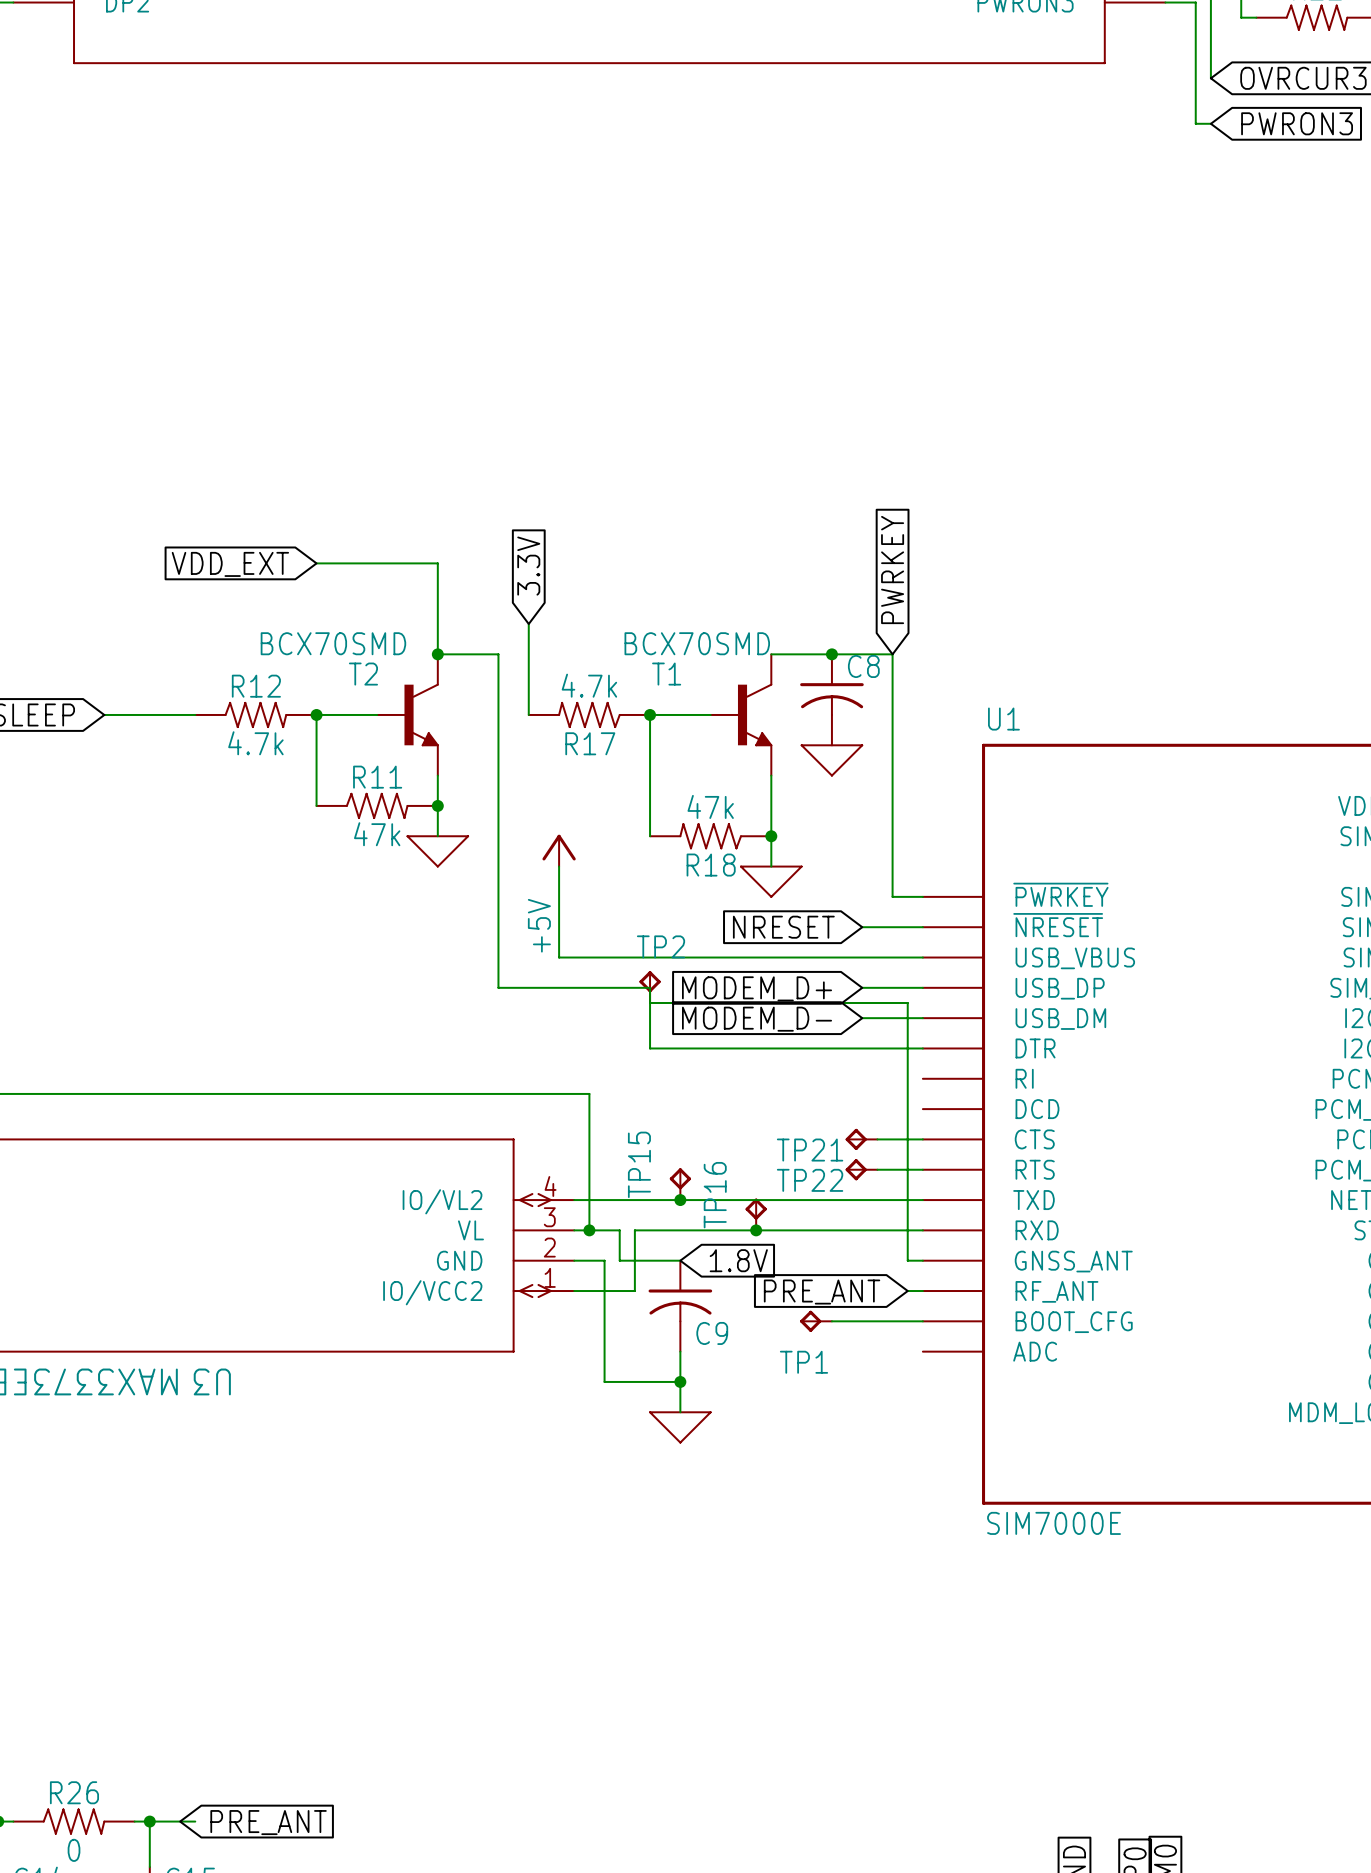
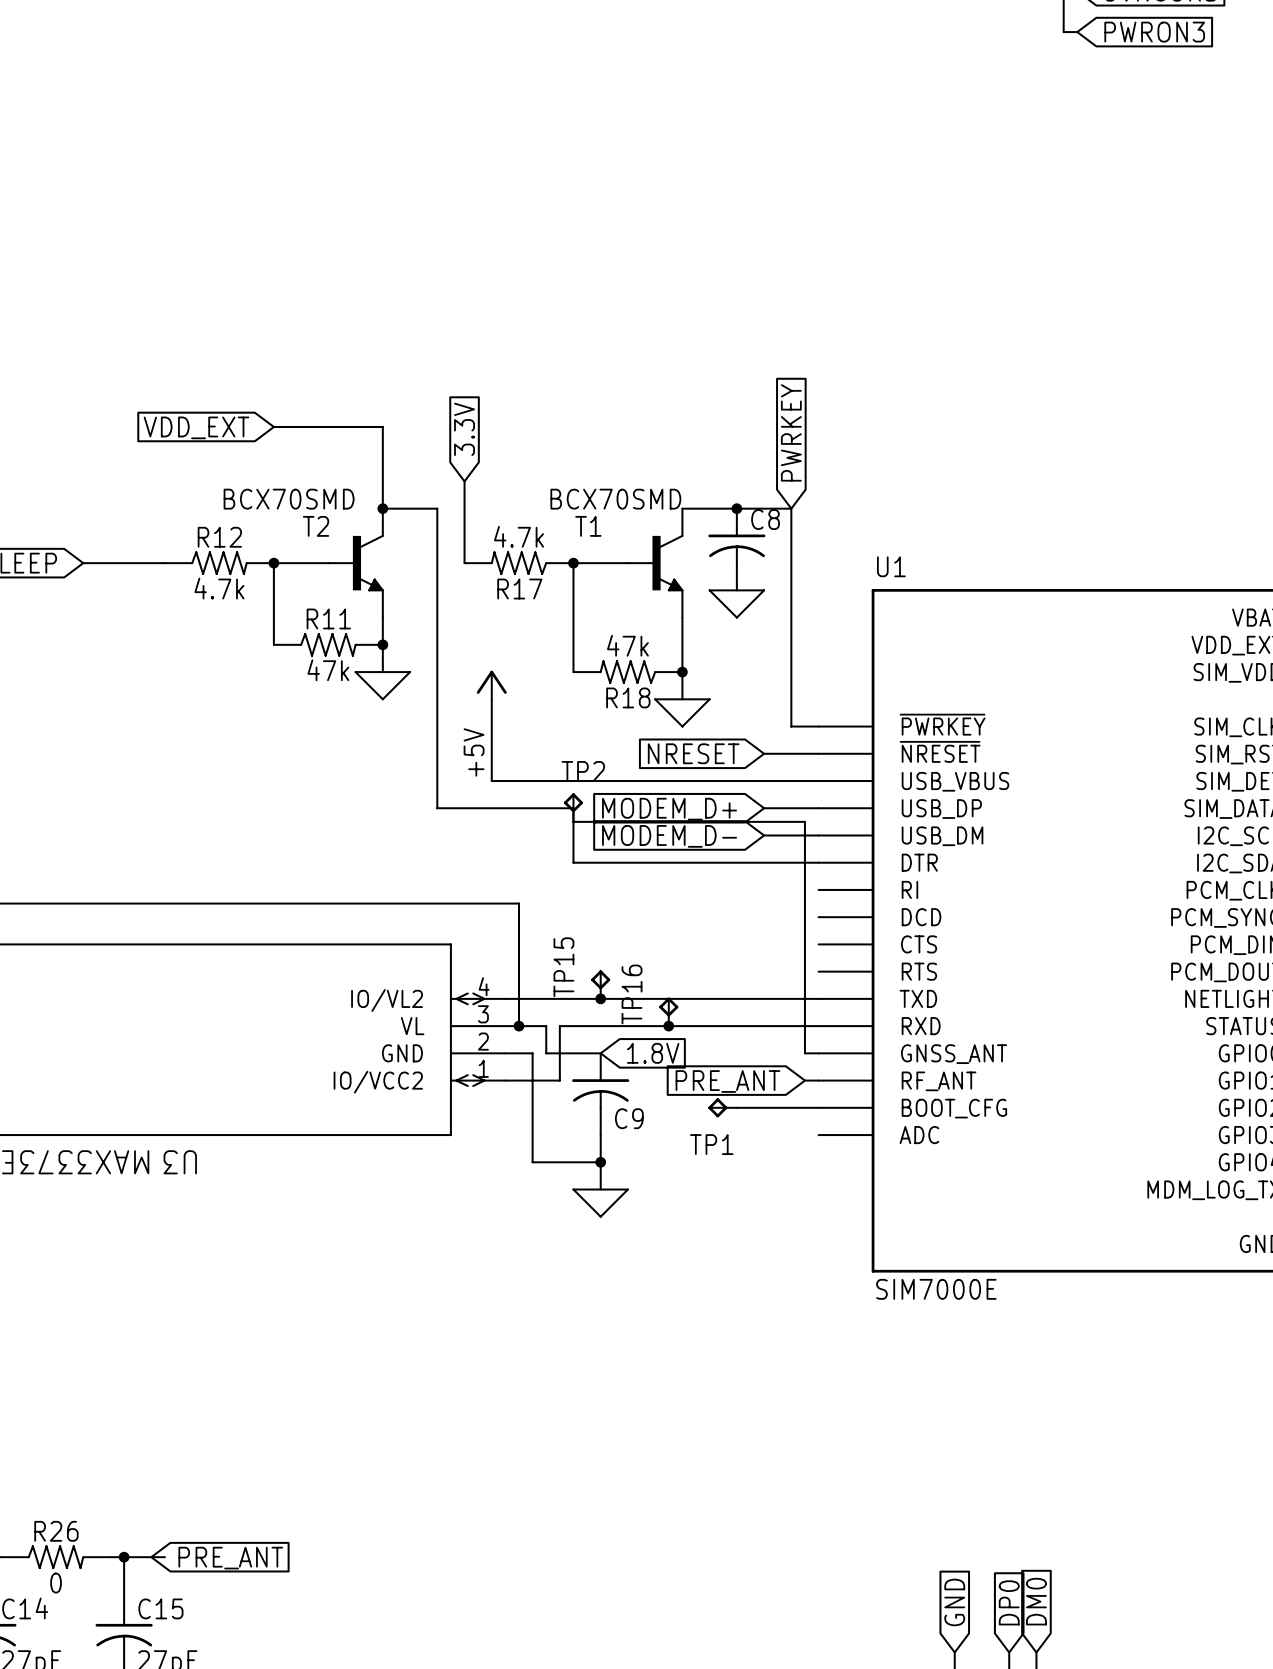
TP21: (861, 1139) -> none
wire: (877, 1139) (922, 1139) -> none
TP22: (861, 1169) -> none
wire: (877, 1169) (922, 1169) -> none

